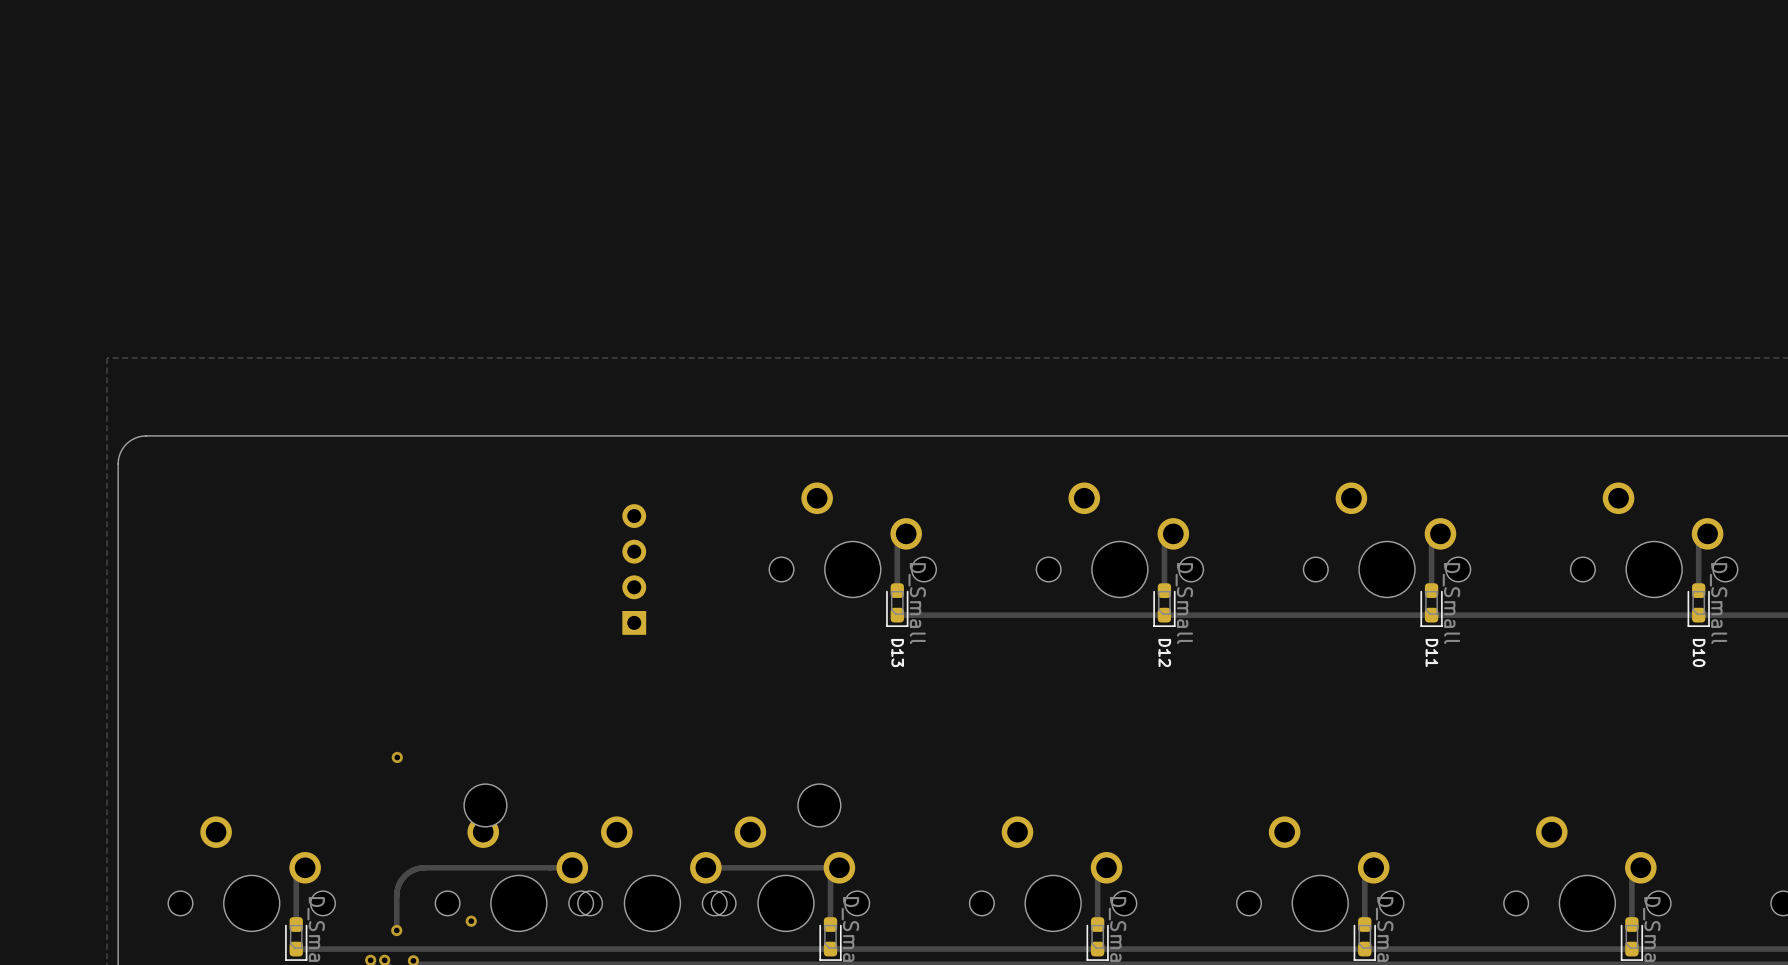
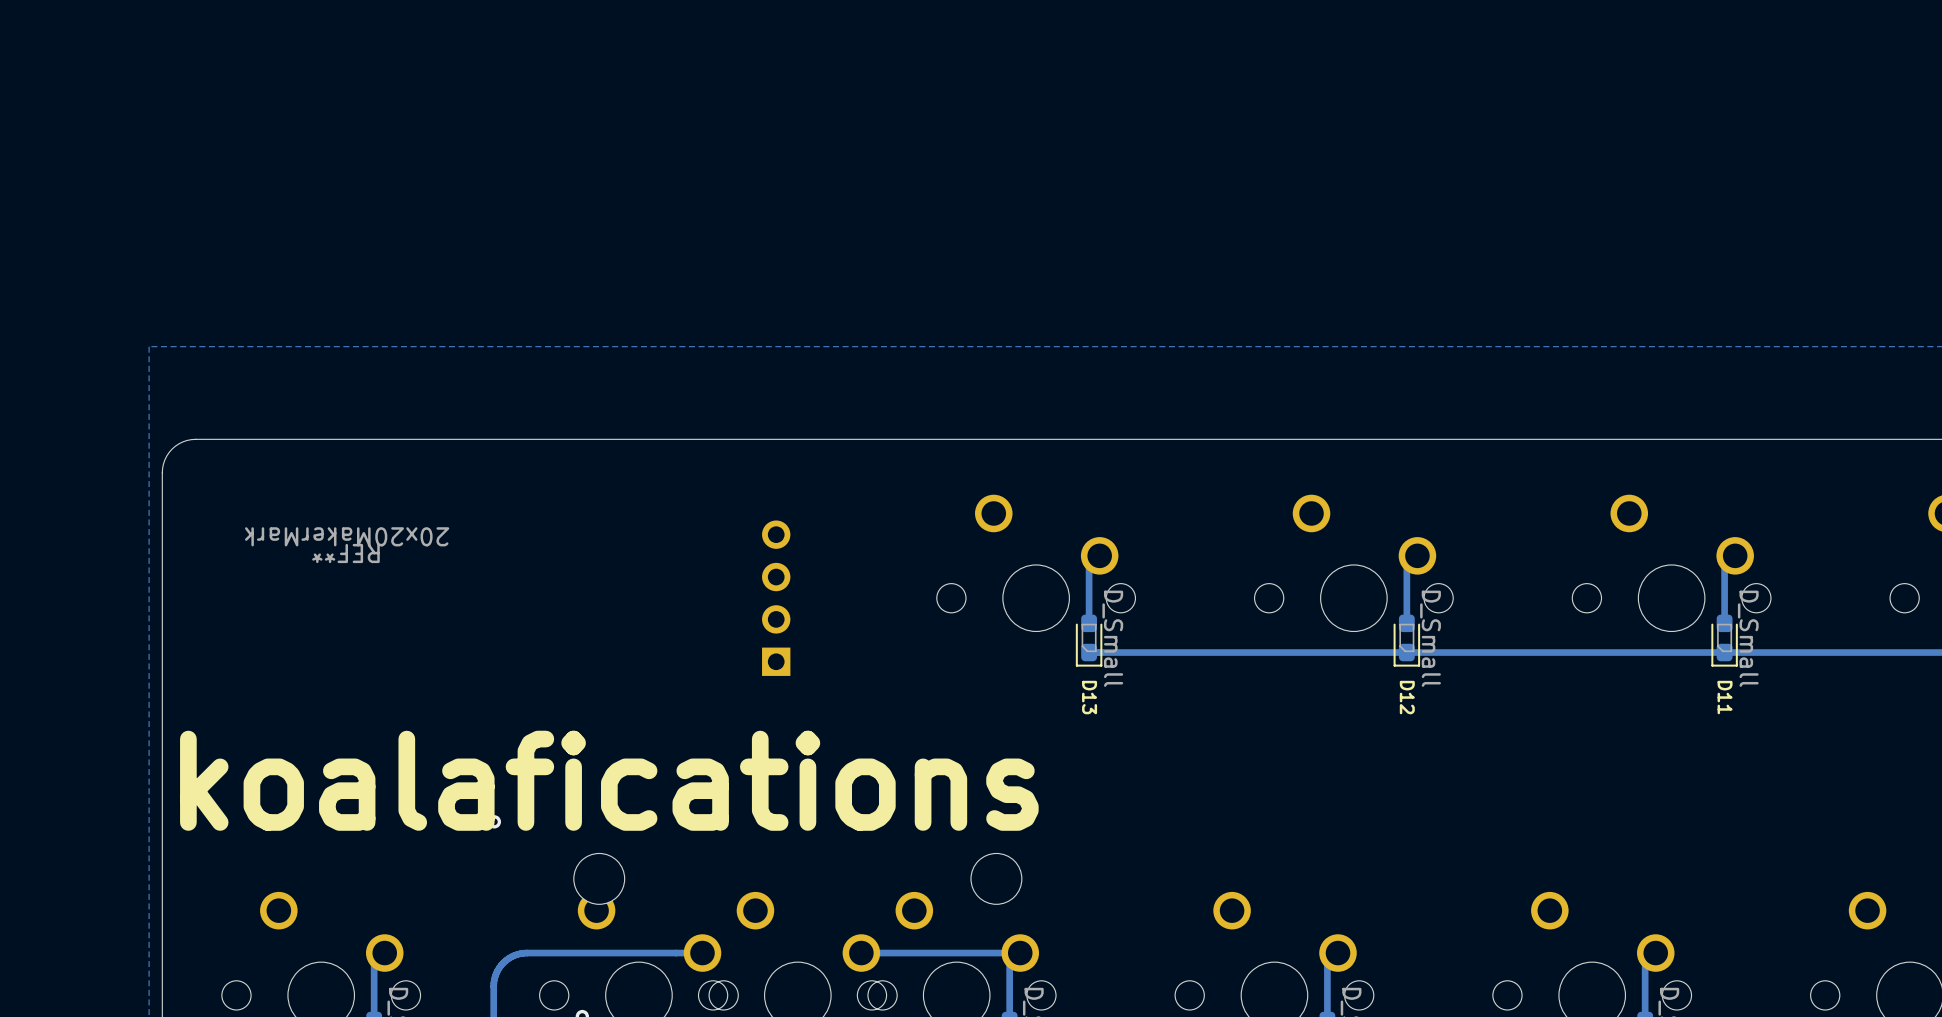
REF**: none -> 20x20MakerMark (347, 545)
text: none -> koalafications (609, 780)

